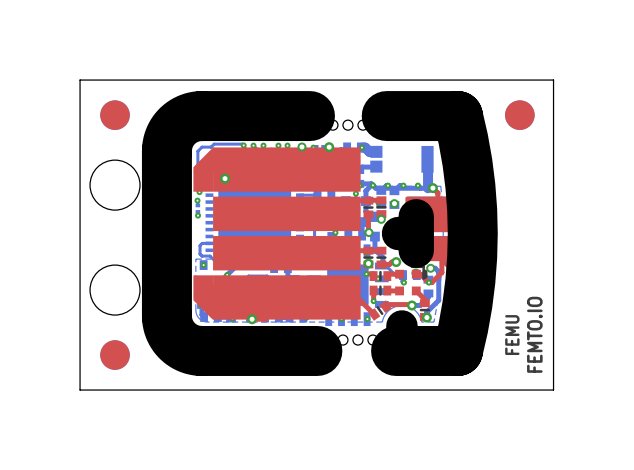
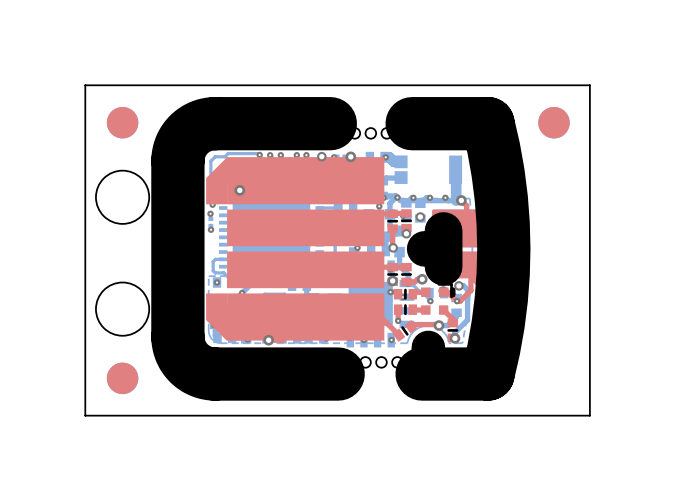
text: FEMTO.IO (534, 334) -> none
text: FEMU (512, 335) -> none

